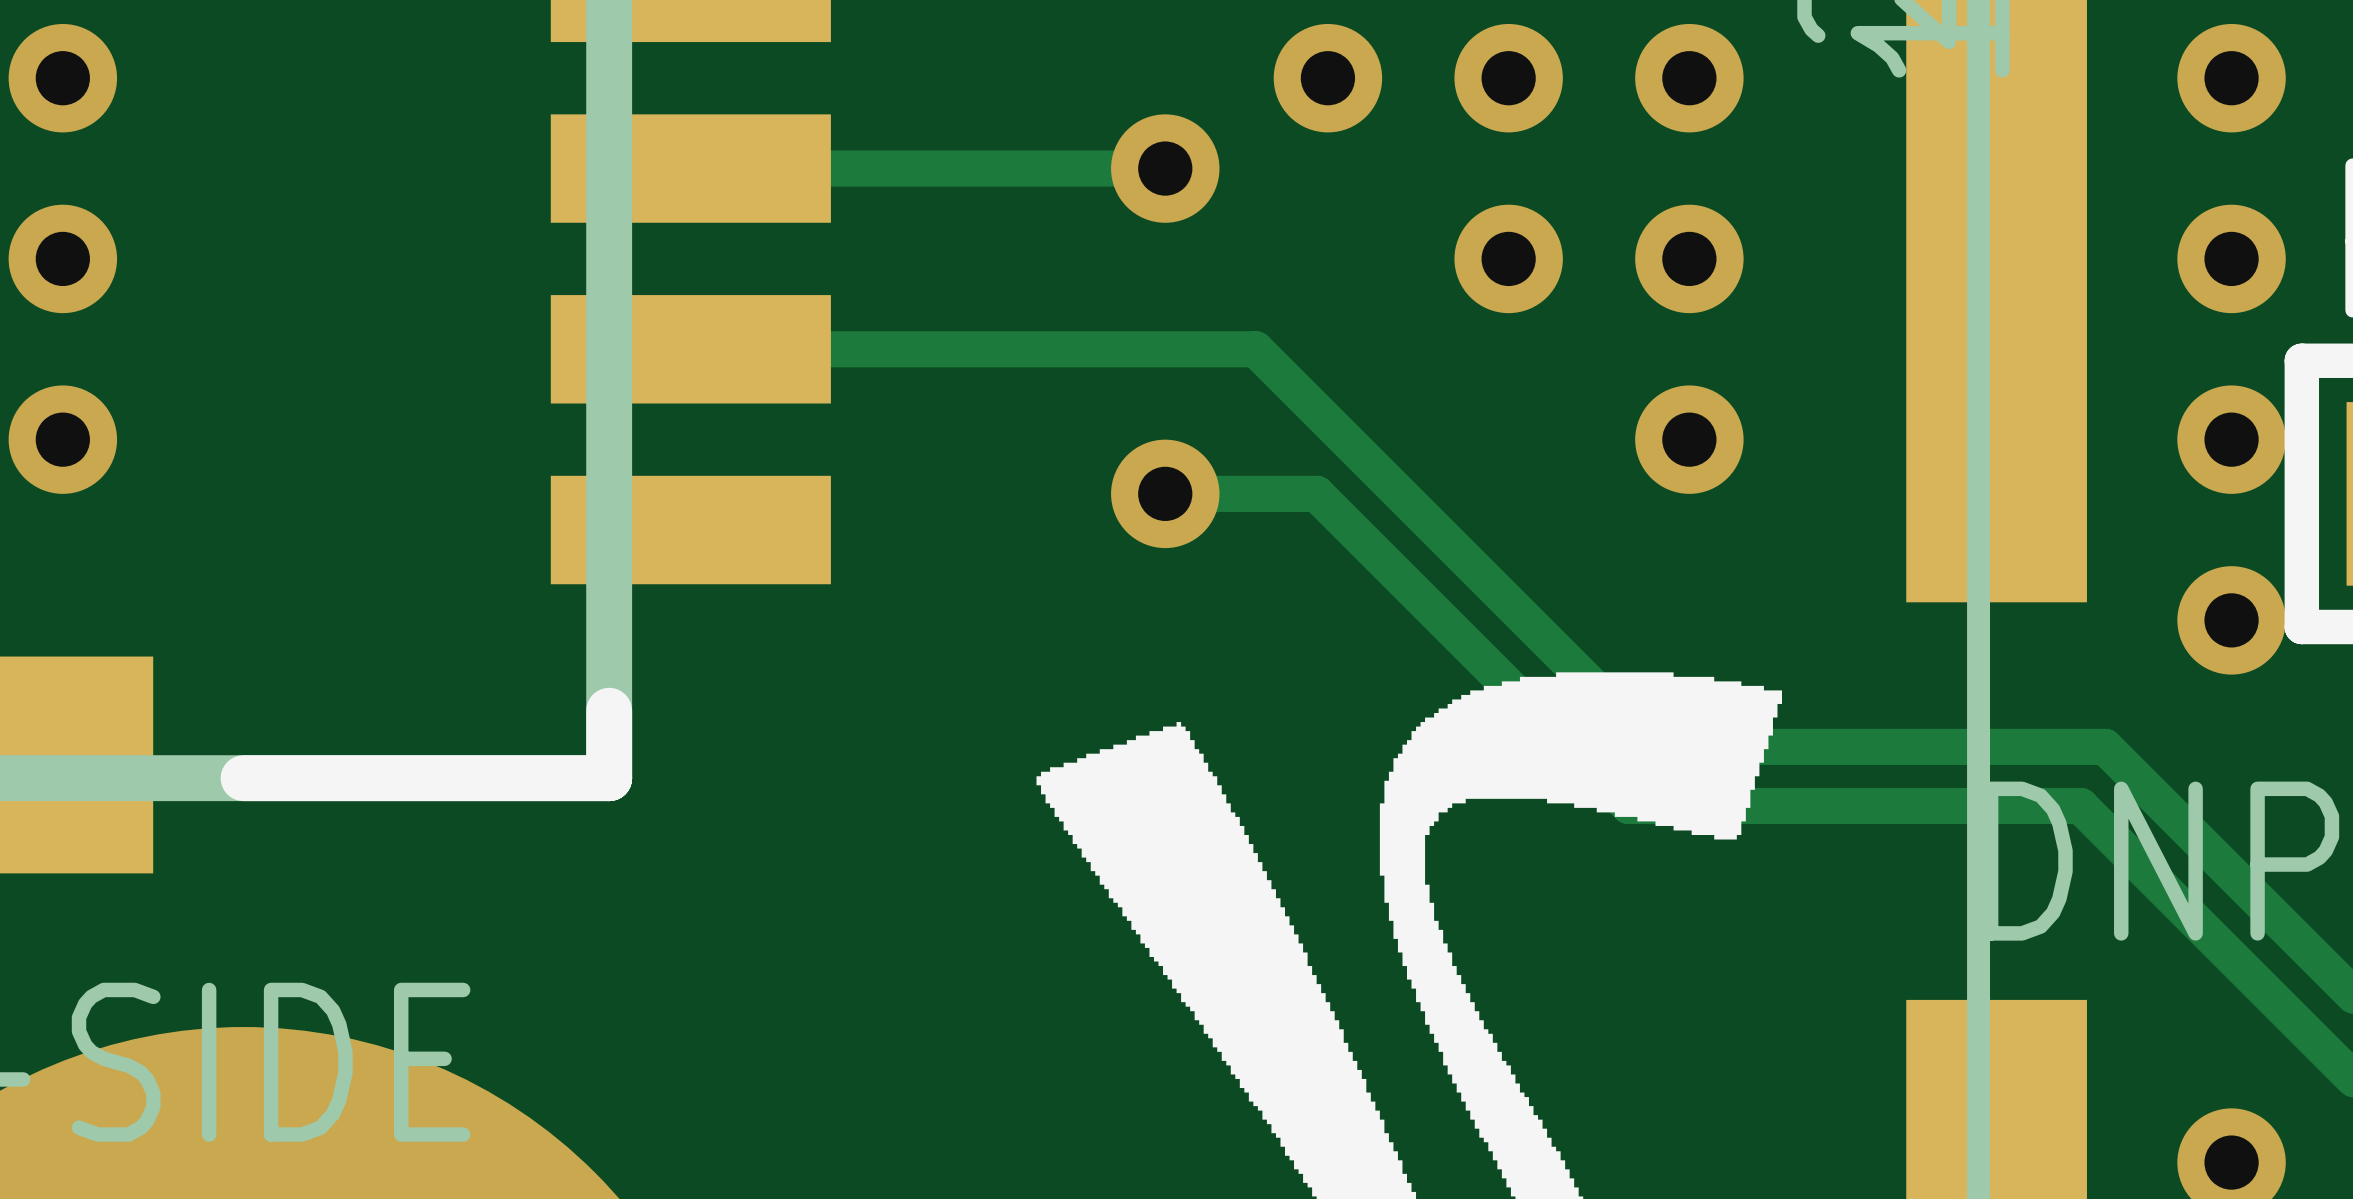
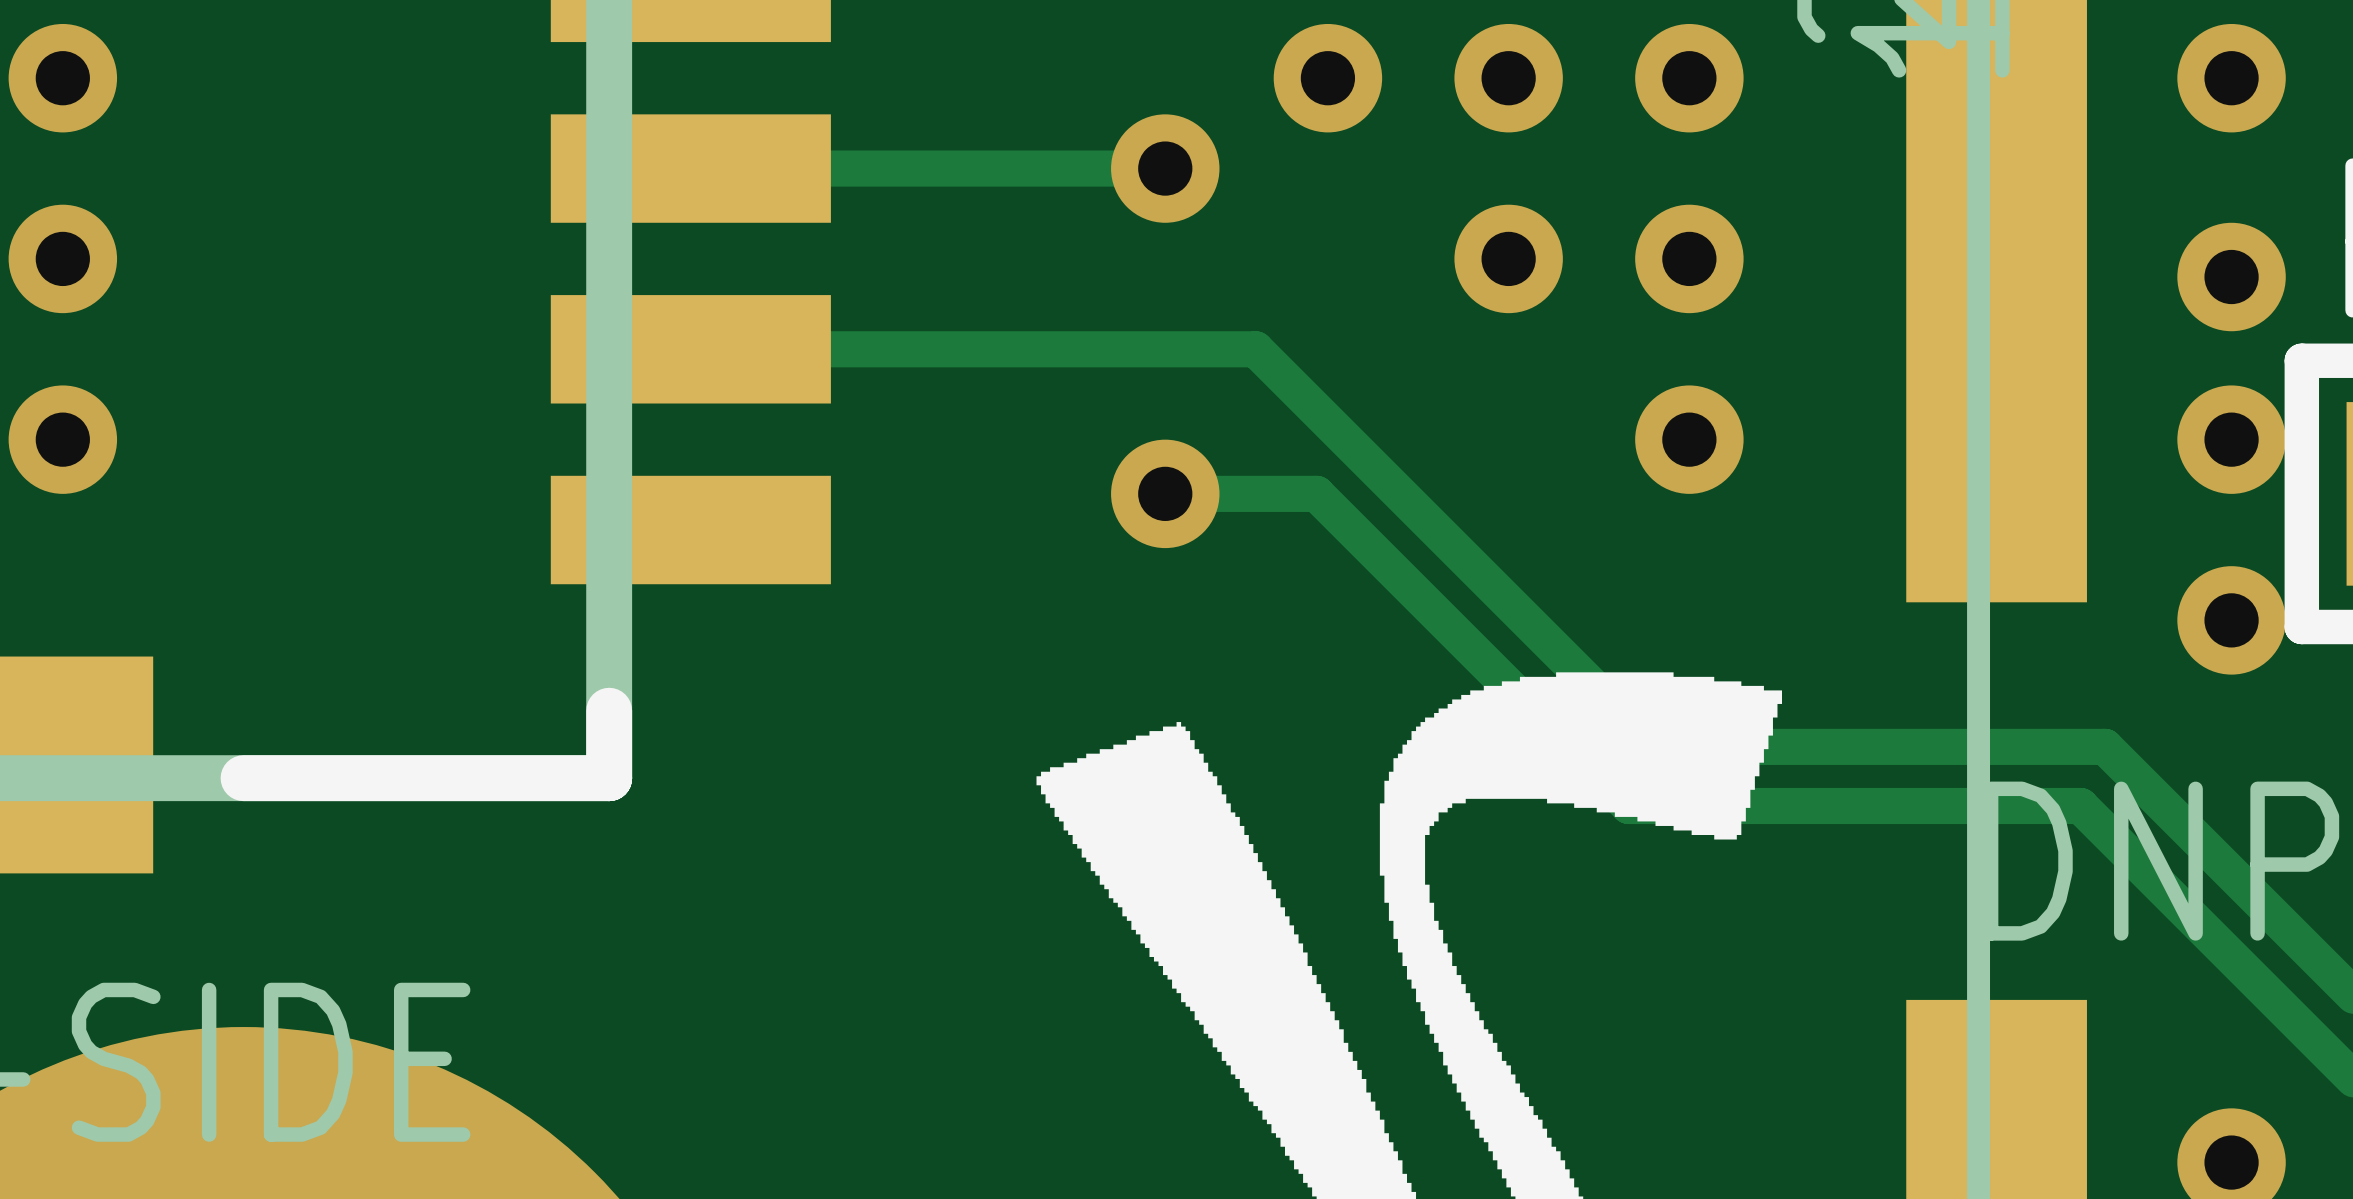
via position: (2231, 258) -> (2231, 277)

